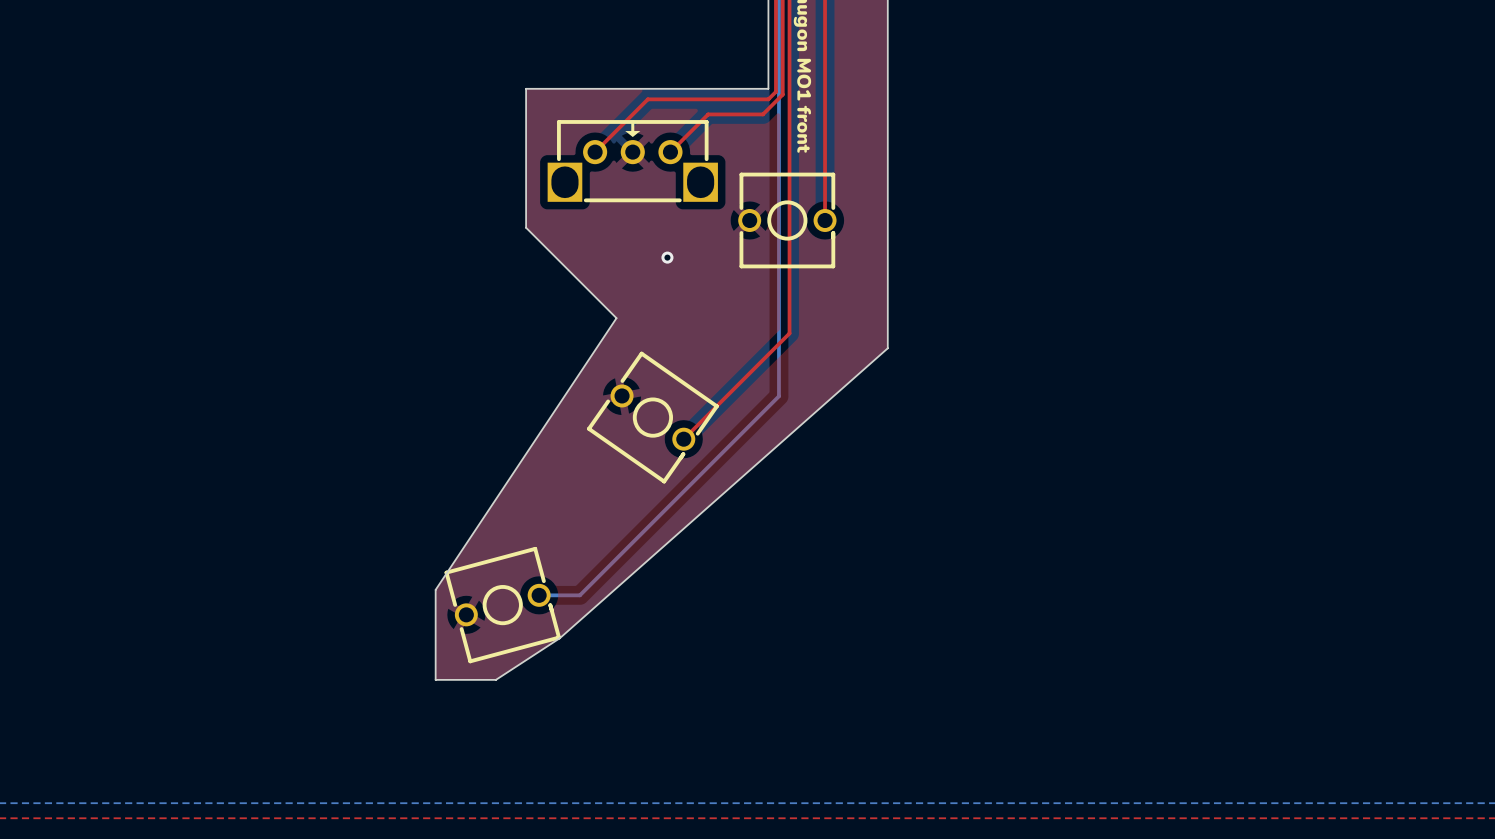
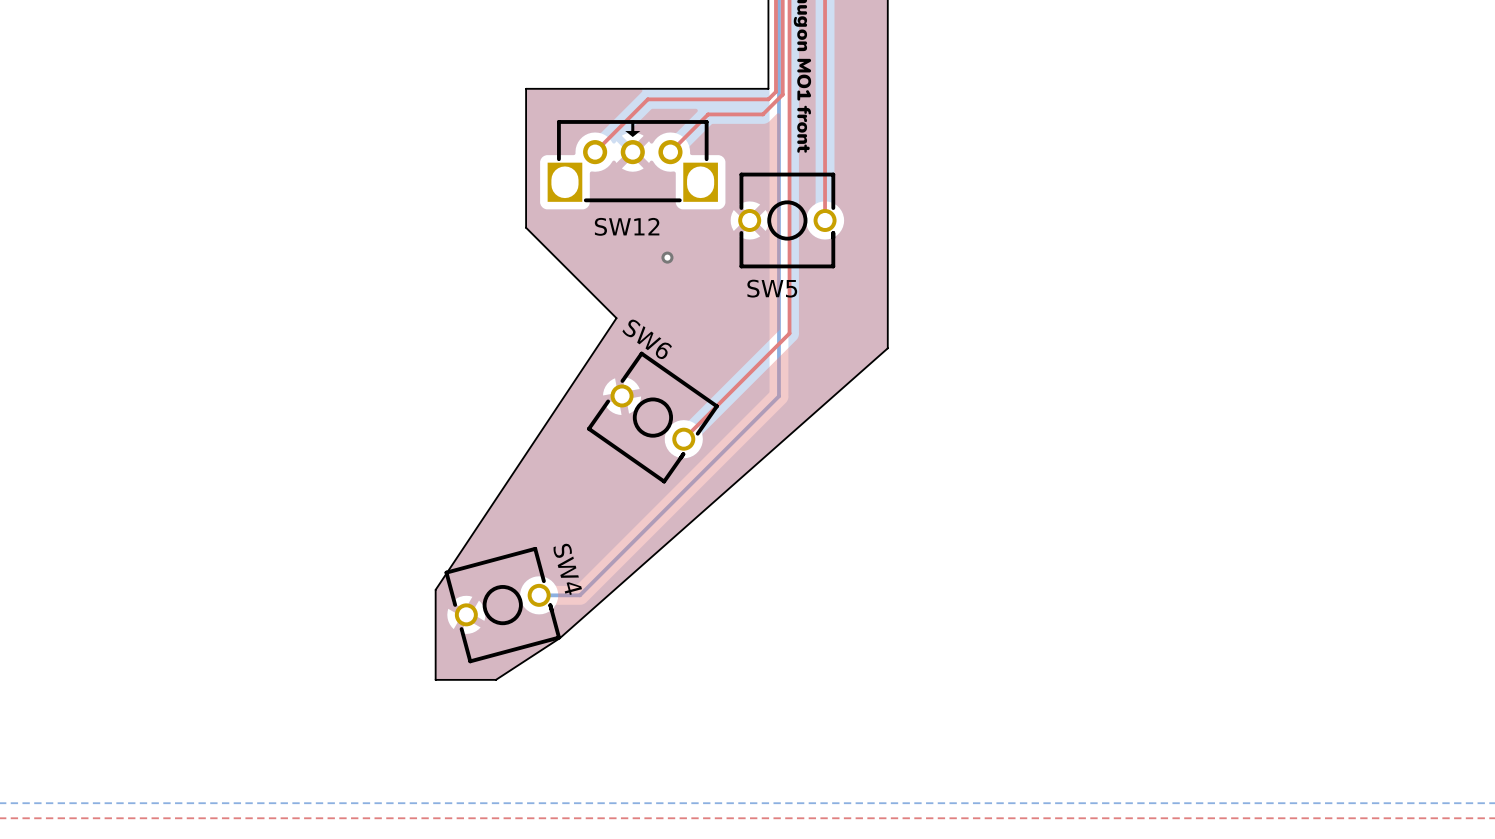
SW12 name: none -> SW12 (627, 226)
SW5 name: none -> SW5 (772, 288)
SW6 name: none -> SW6 (647, 339)
SW4 name: none -> SW4 (567, 569)

